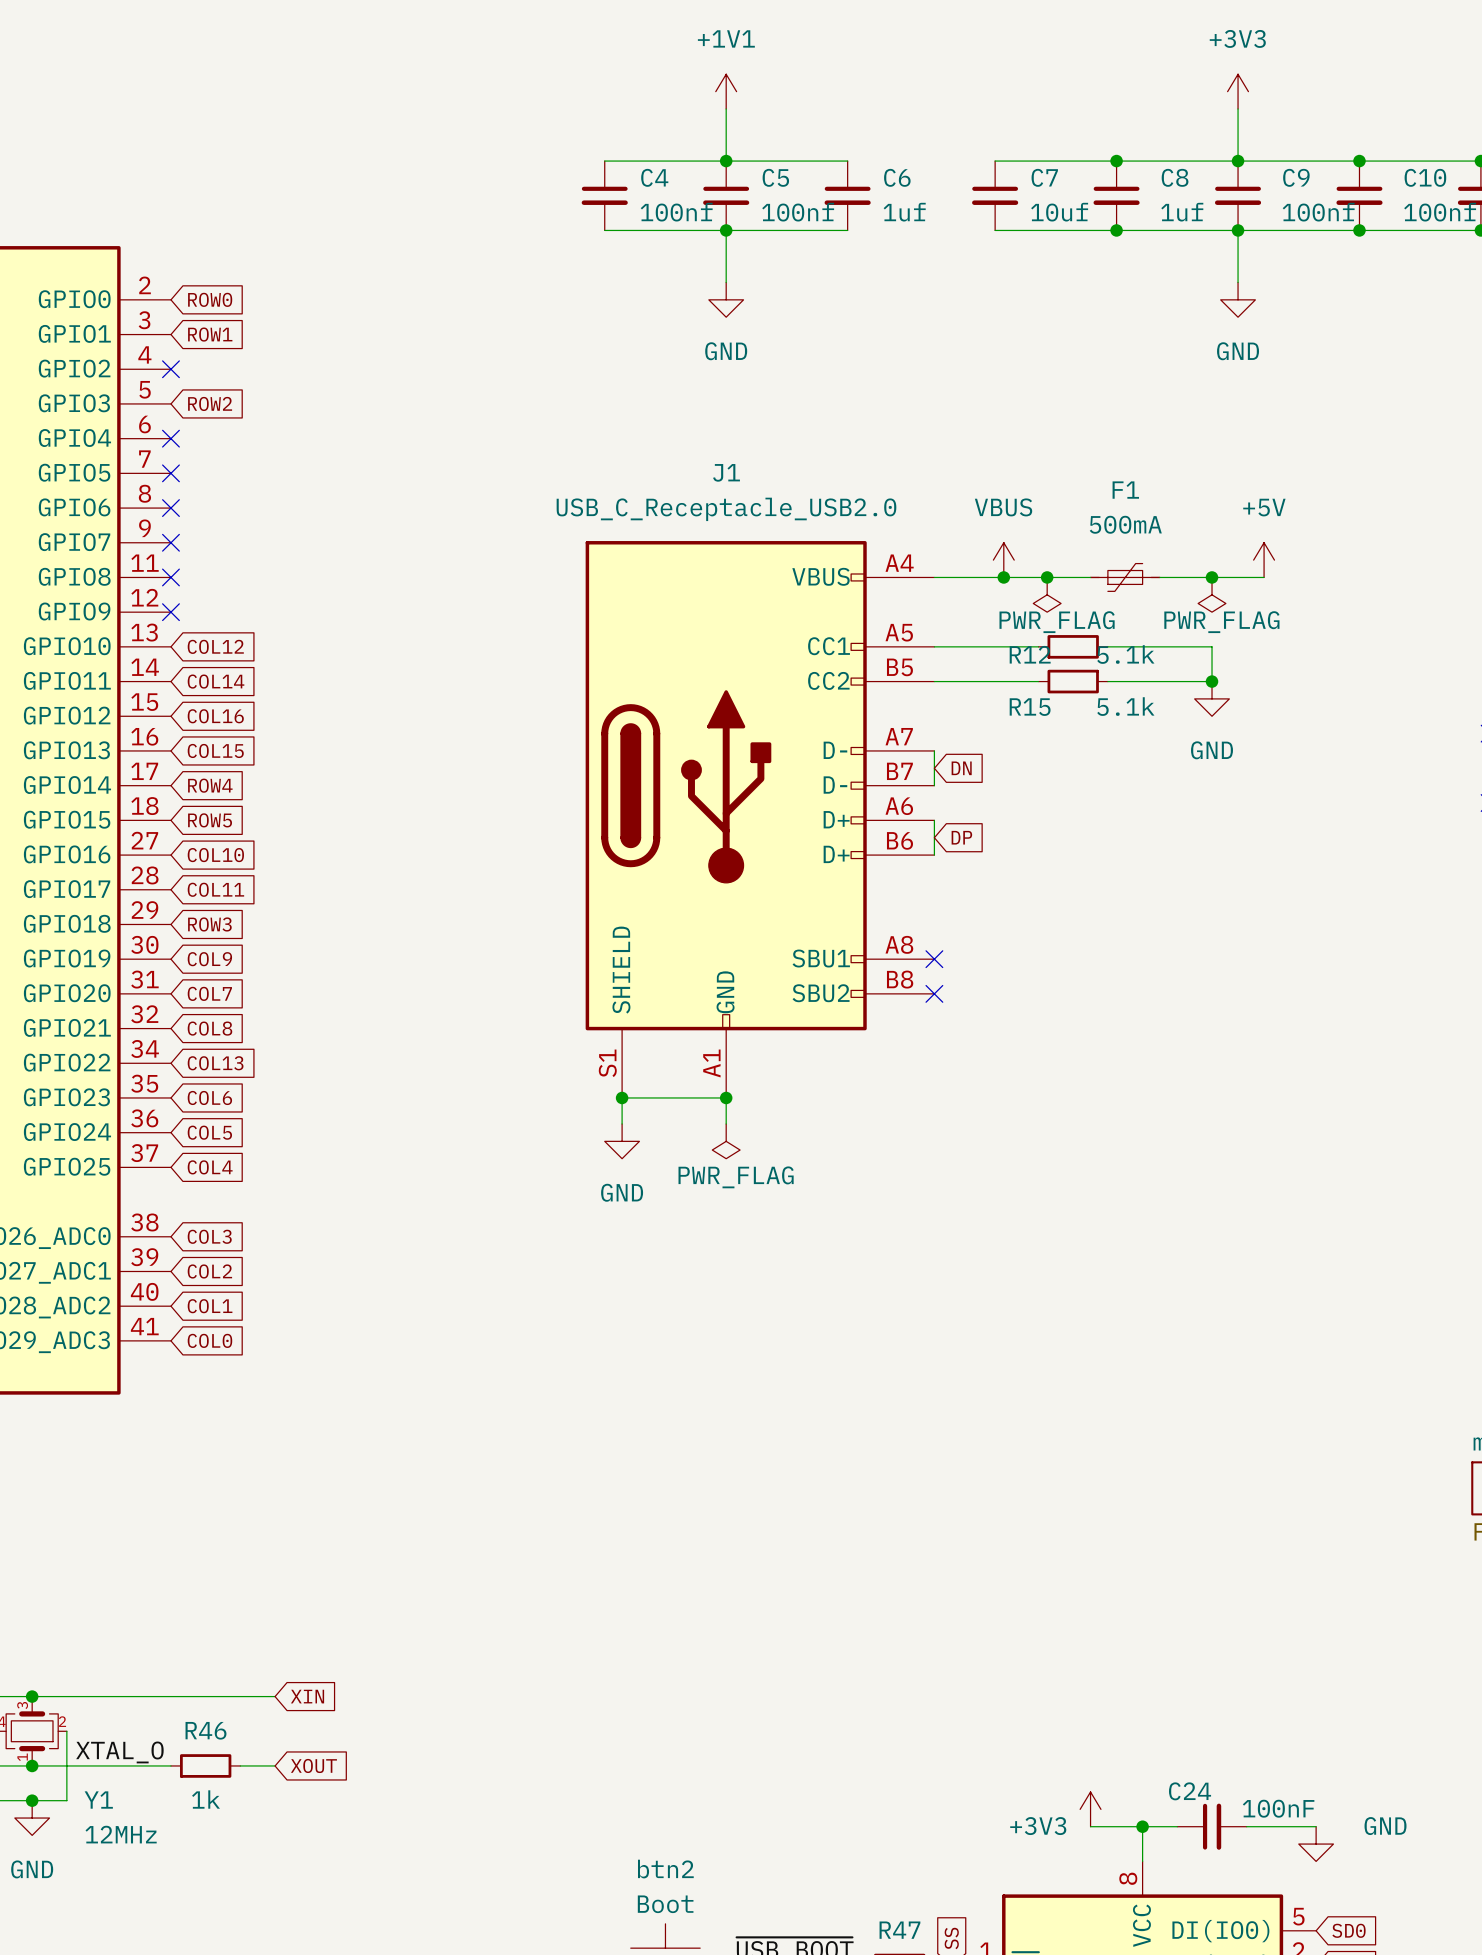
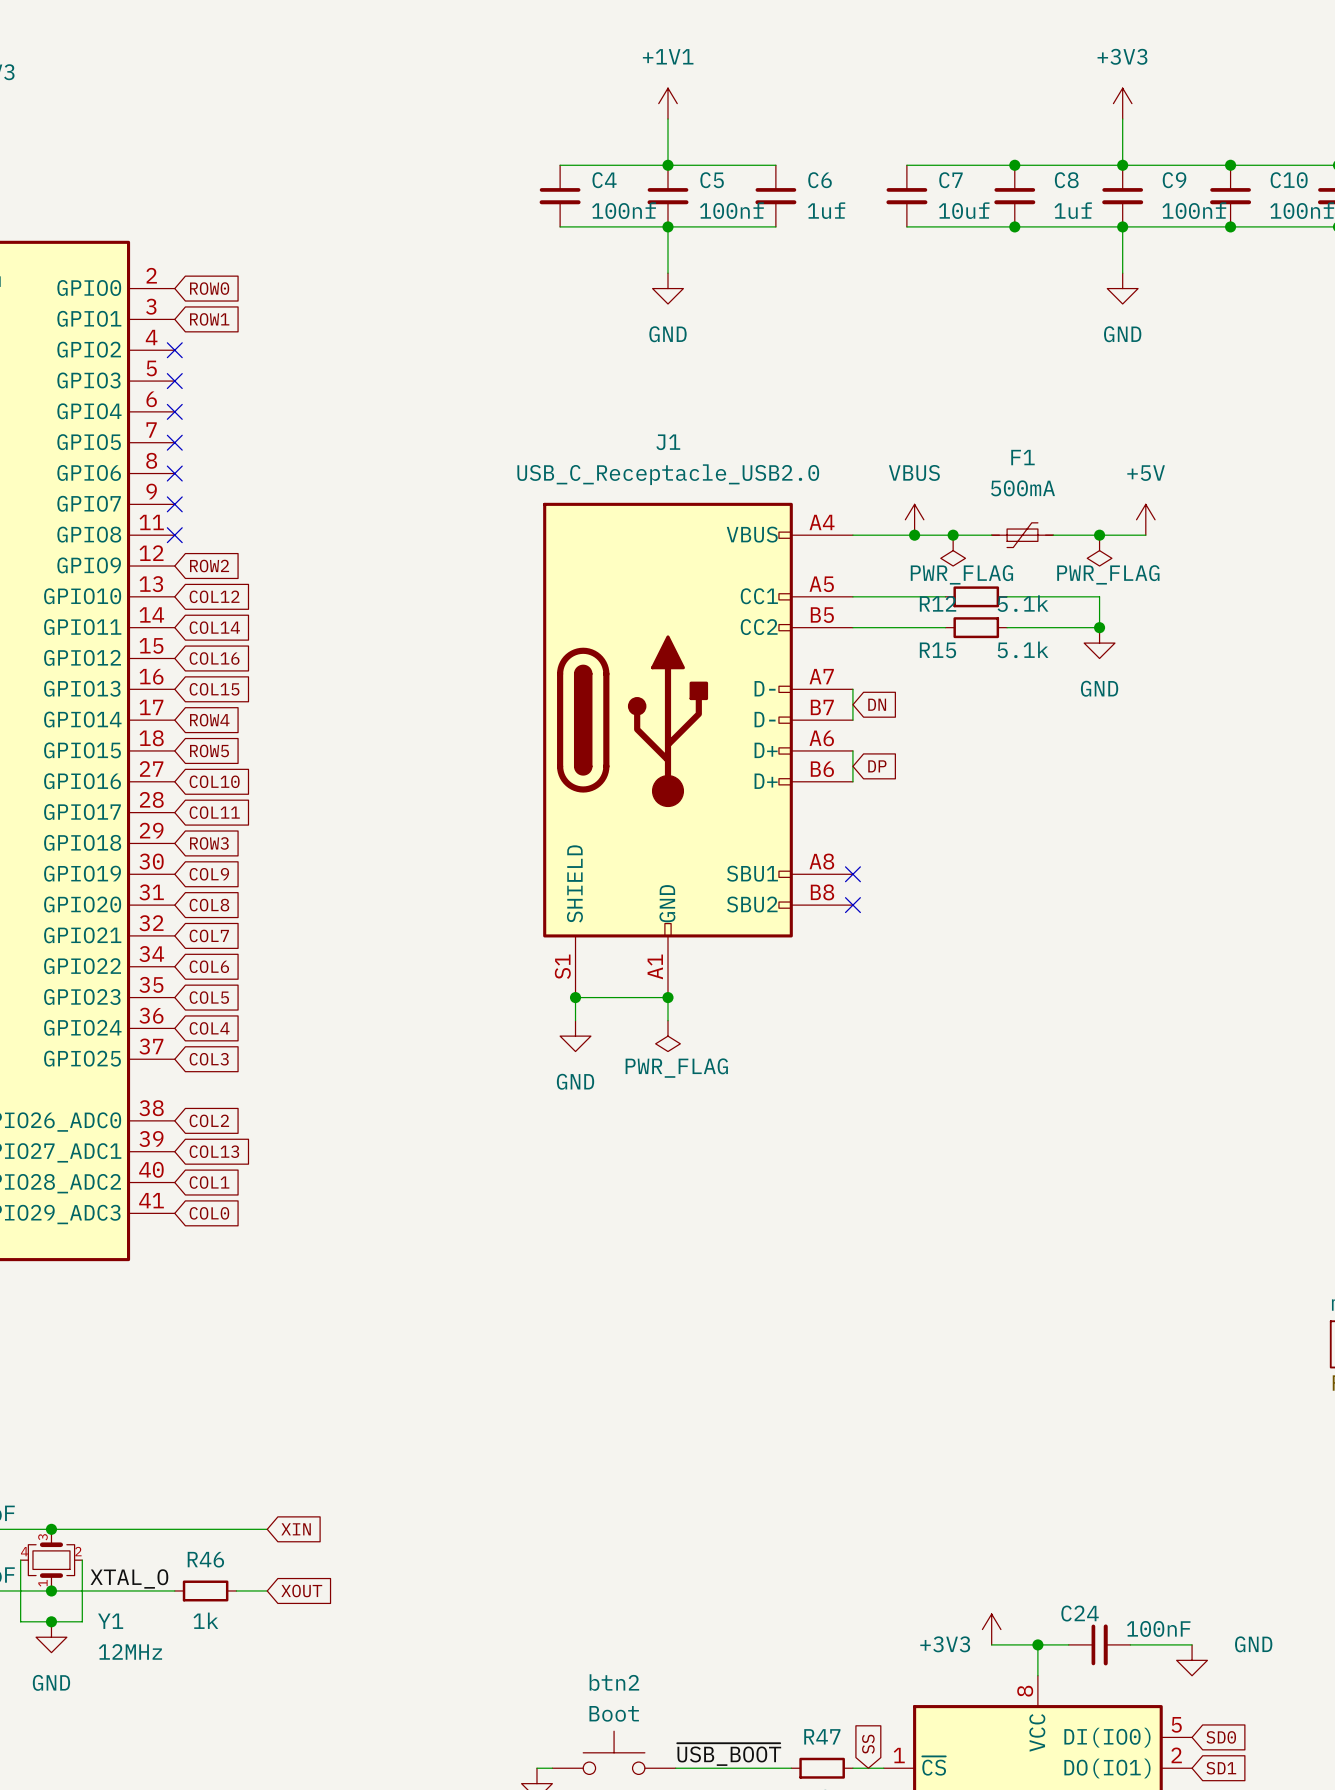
no-connect mark: none -> (174, 381)
global label position: ROW2 (210, 403) -> ROW2 (209, 566)
no-connect mark: (170, 612) -> none
global label: COL7 (209, 993) -> COL8 (209, 905)
global label: COL8 (209, 1028) -> COL7 (209, 935)
global label: COL13 (215, 1063) -> COL6 (209, 966)
global label: COL6 (209, 1097) -> COL5 (209, 997)
global label: COL5 (209, 1132) -> COL4 (209, 1028)
global label: COL4 (210, 1167) -> COL3 (209, 1059)
global label: COL3 (209, 1236) -> COL2 (209, 1120)
global label: COL2 (209, 1271) -> COL13 (214, 1151)

